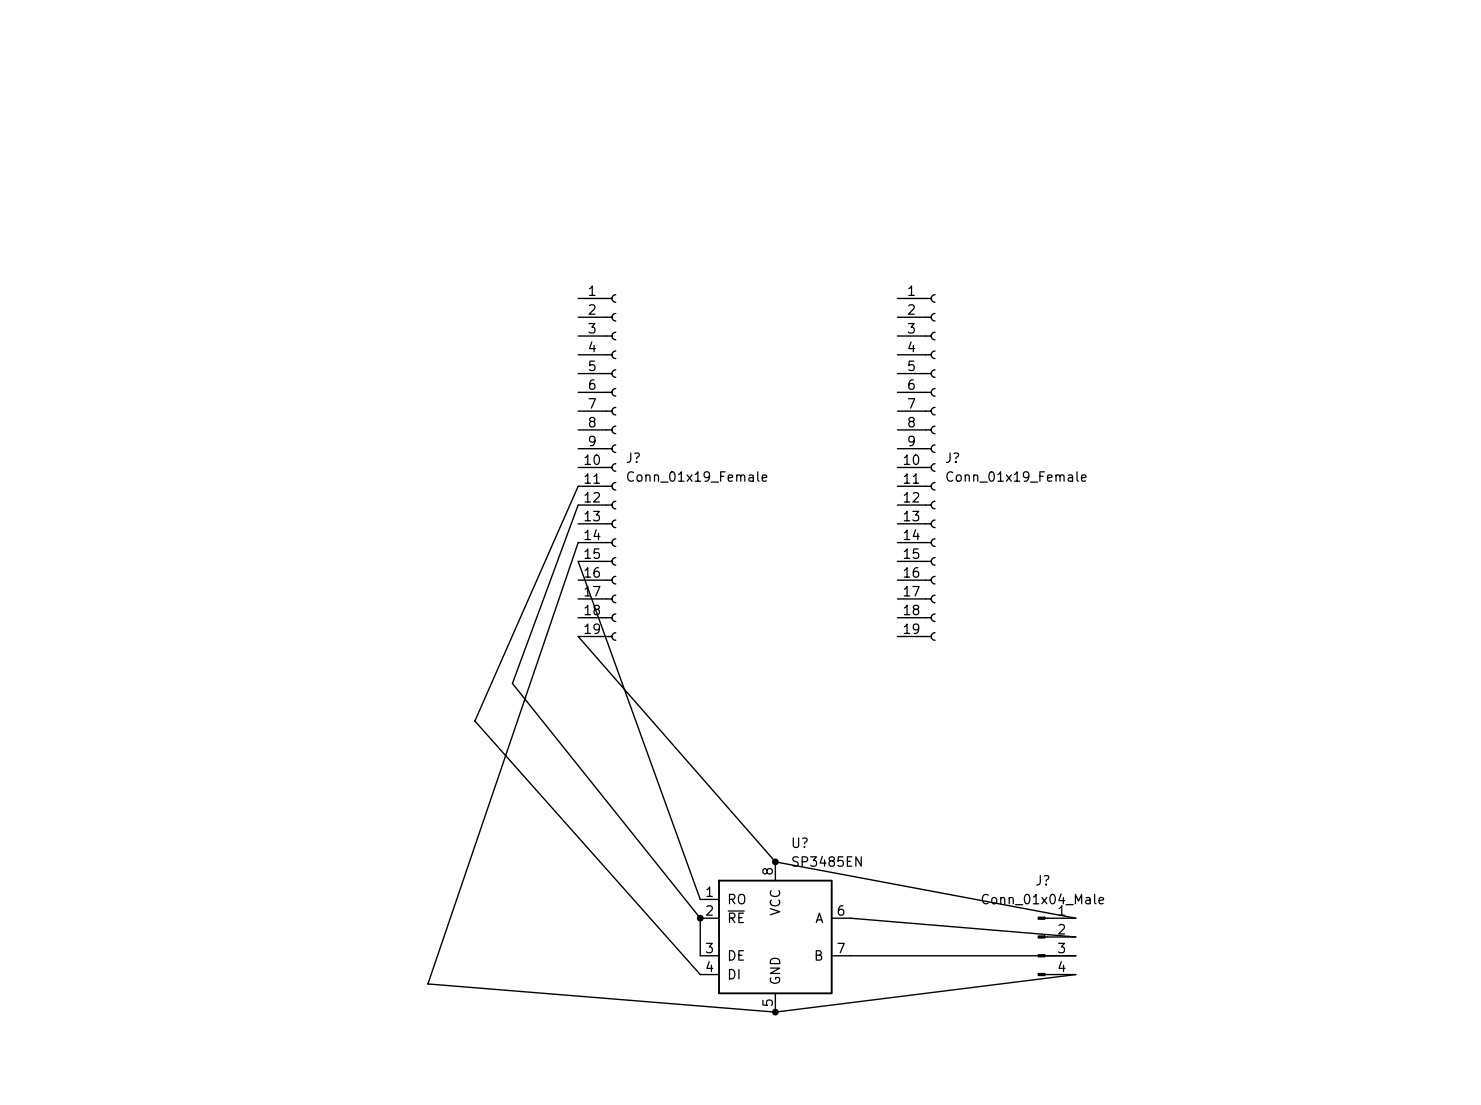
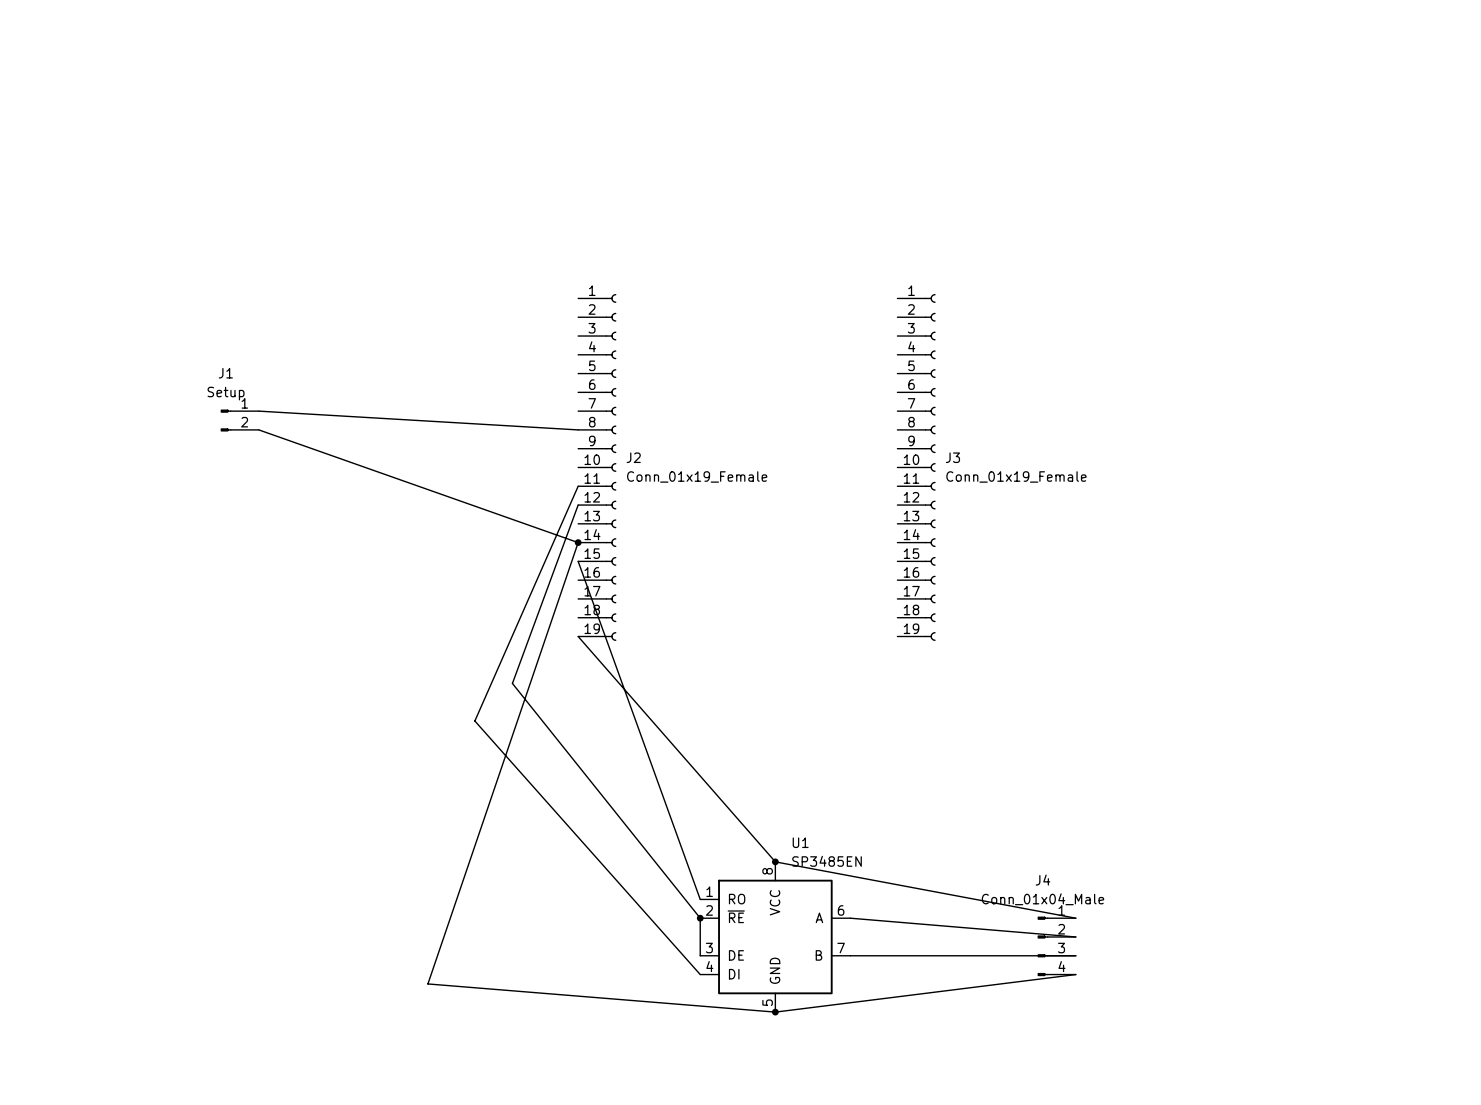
wire: none -> (258, 411) (578, 429)
J1: none -> Setup (239, 420)
wire: none -> (258, 429) (578, 542)
J? name: J? (633, 457) -> J2 (633, 457)
J? name: J? (952, 457) -> J3 (952, 457)
junction: none -> (578, 542)
U? name: U? (800, 842) -> U1 (800, 842)
J? name: J? (1042, 880) -> J4 (1042, 880)

